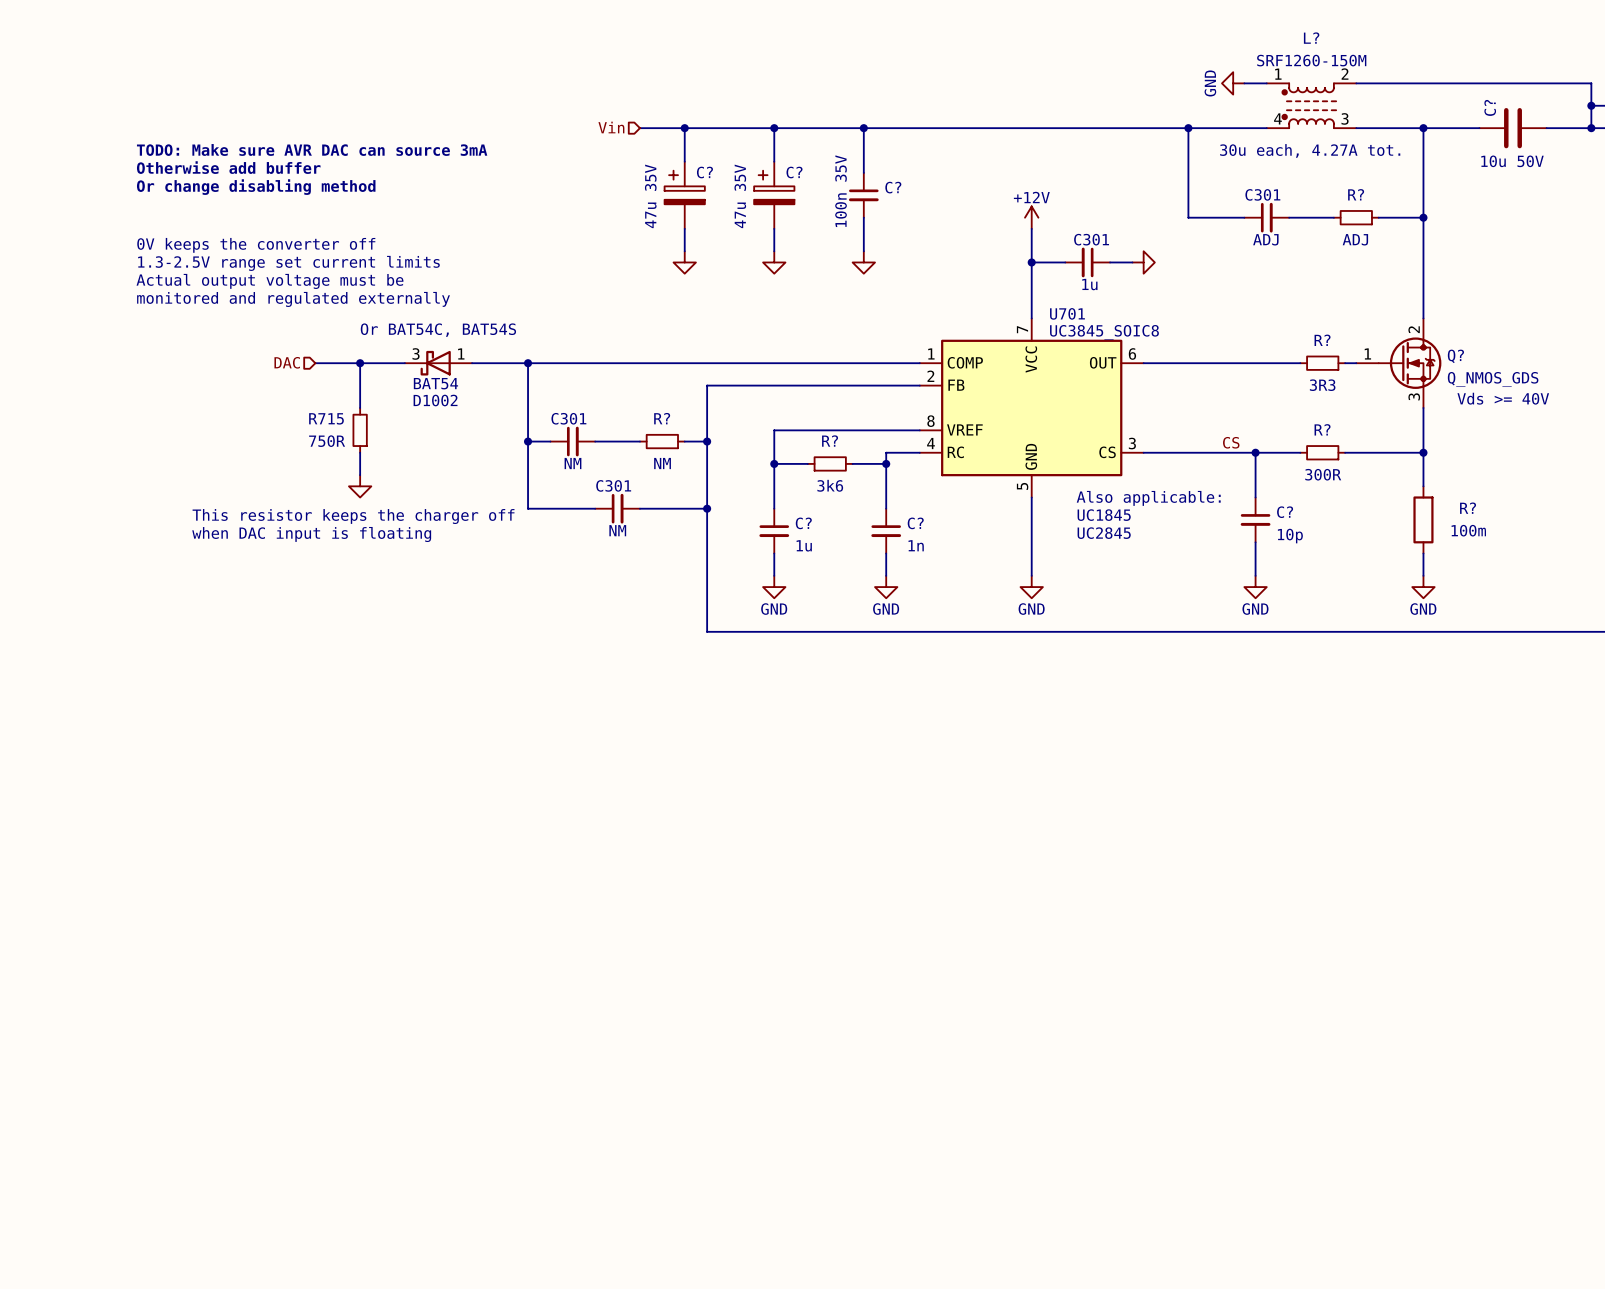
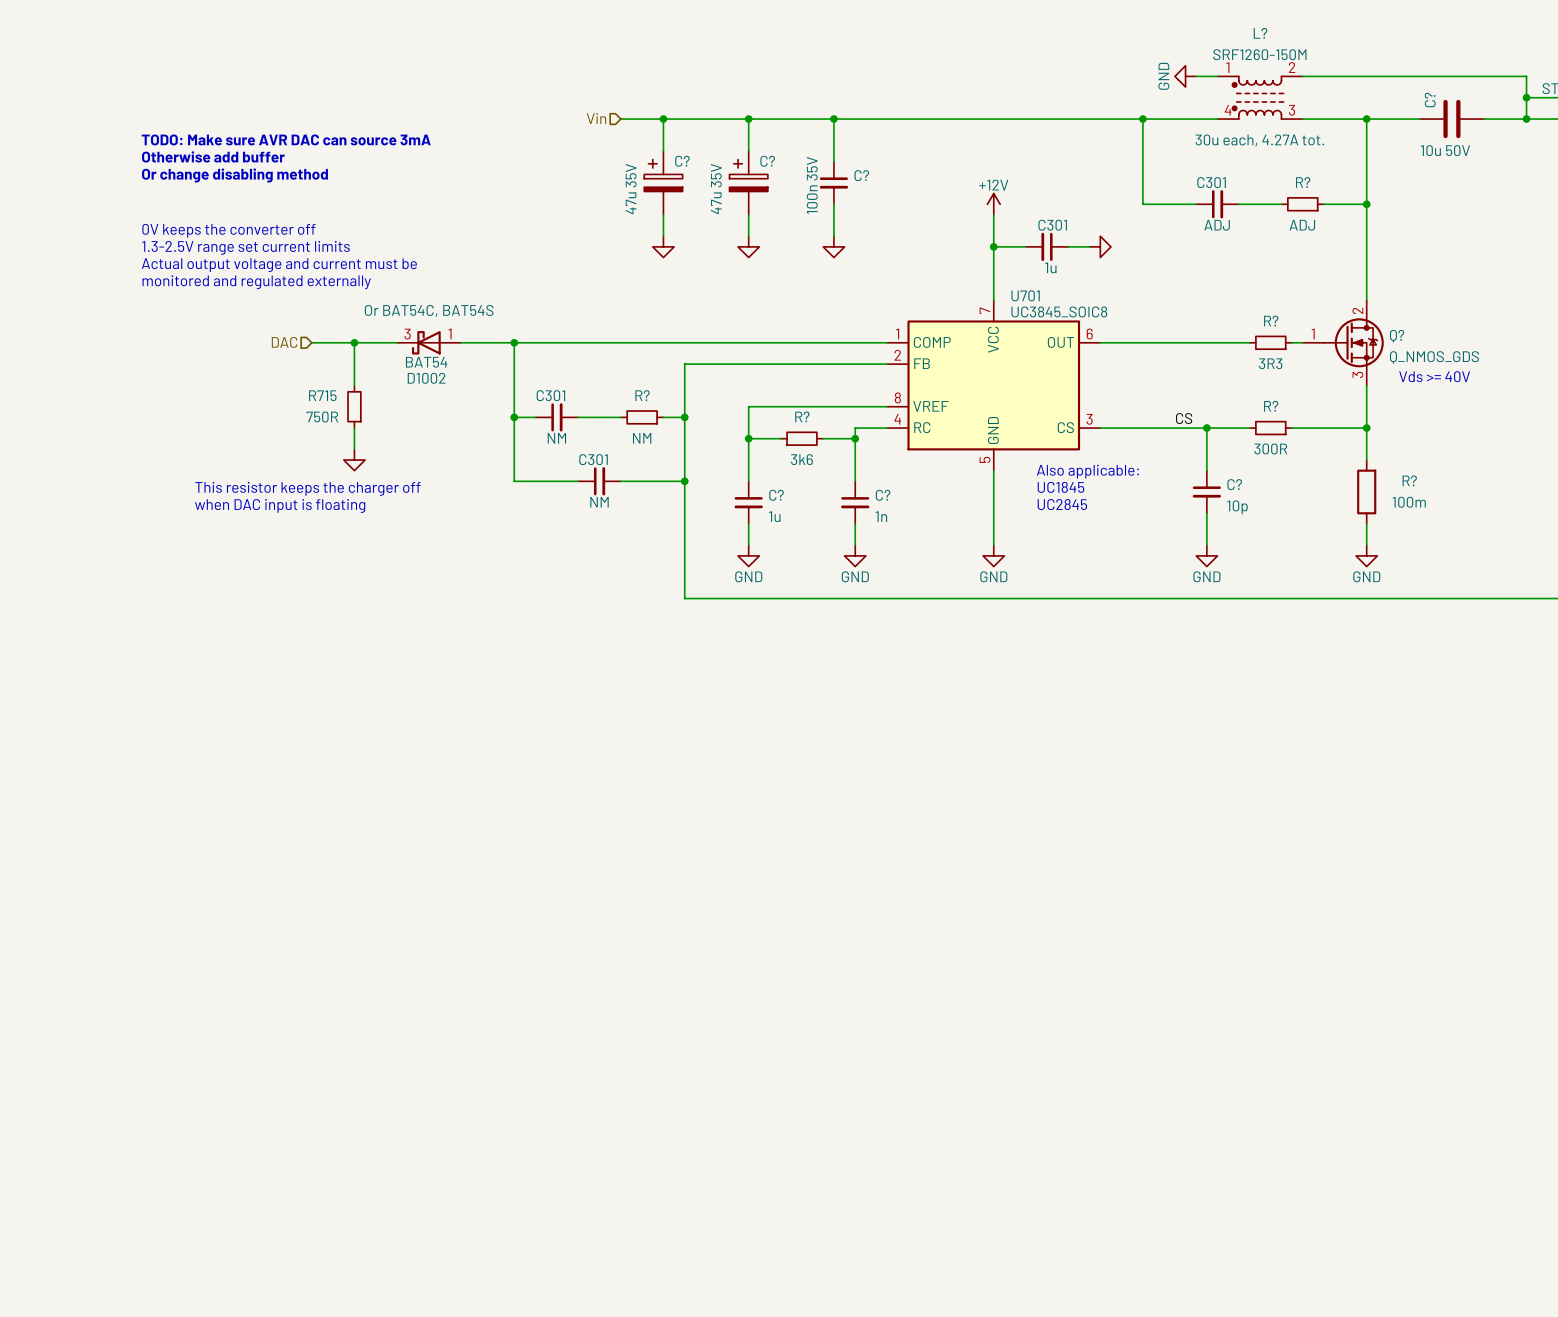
text: Actual output voltage must be (269, 281) -> Actual output voltage and current must be (279, 265)

